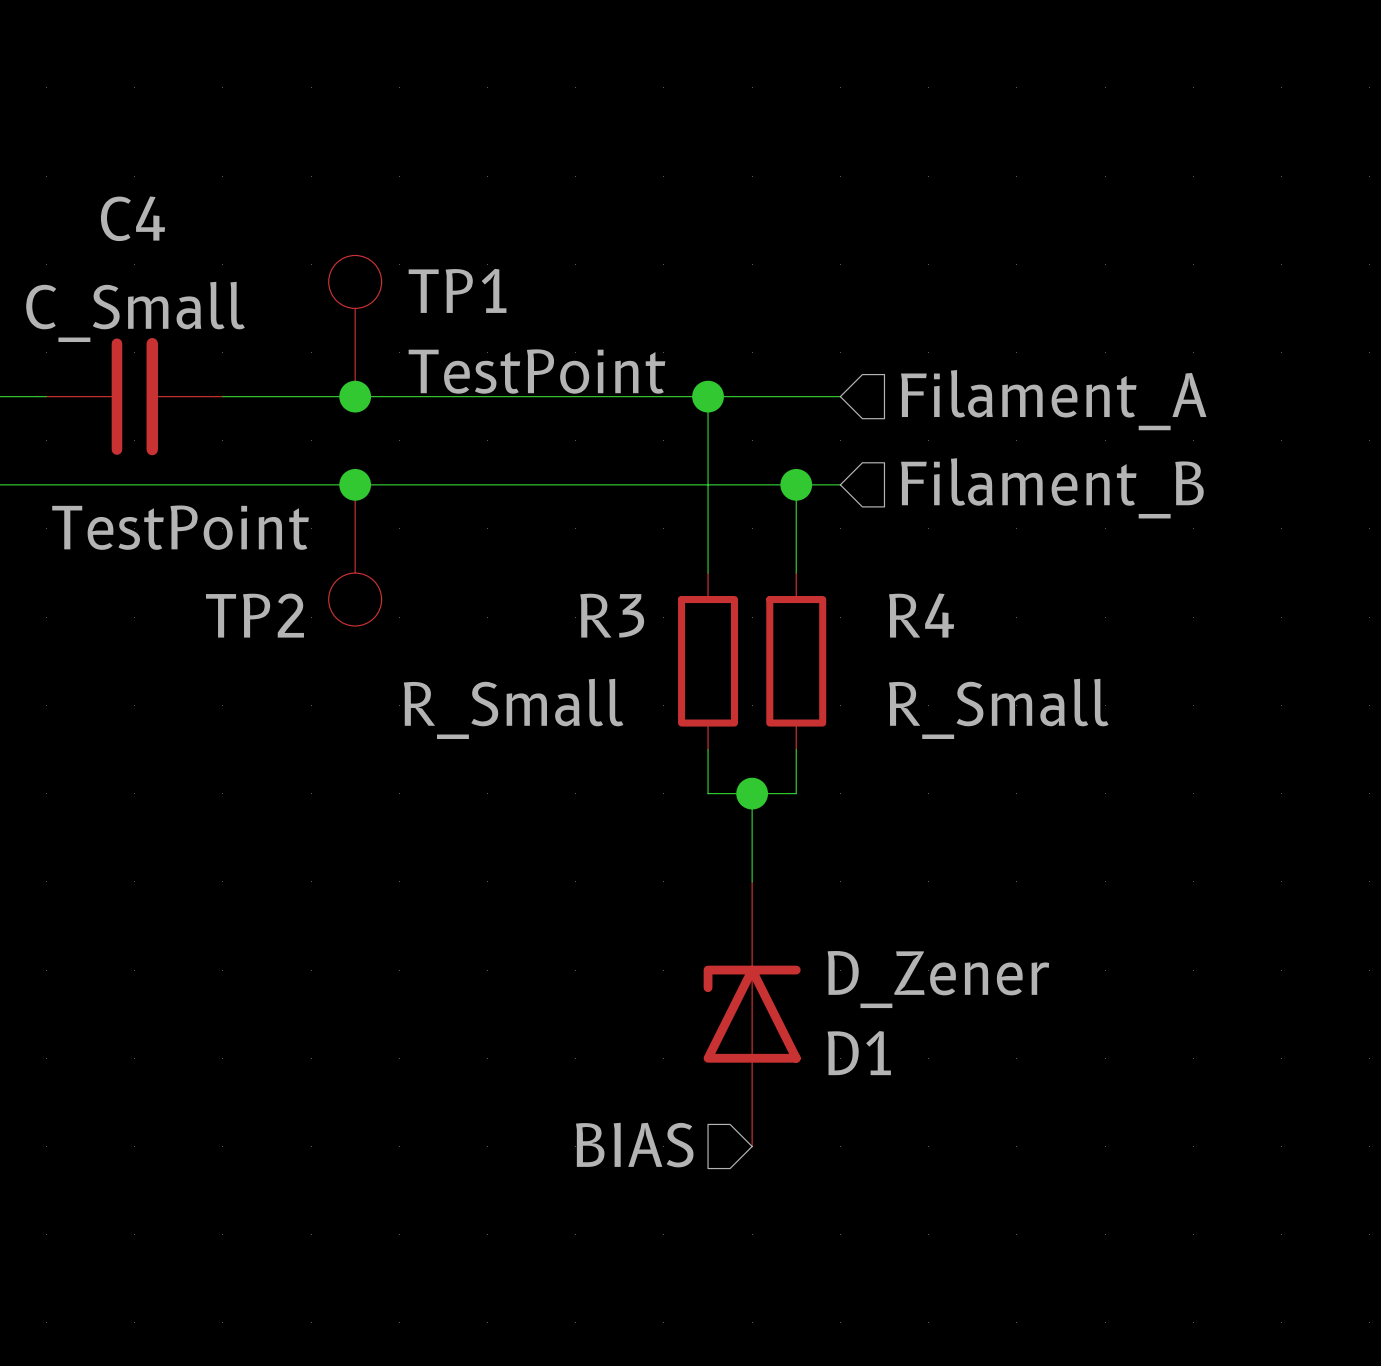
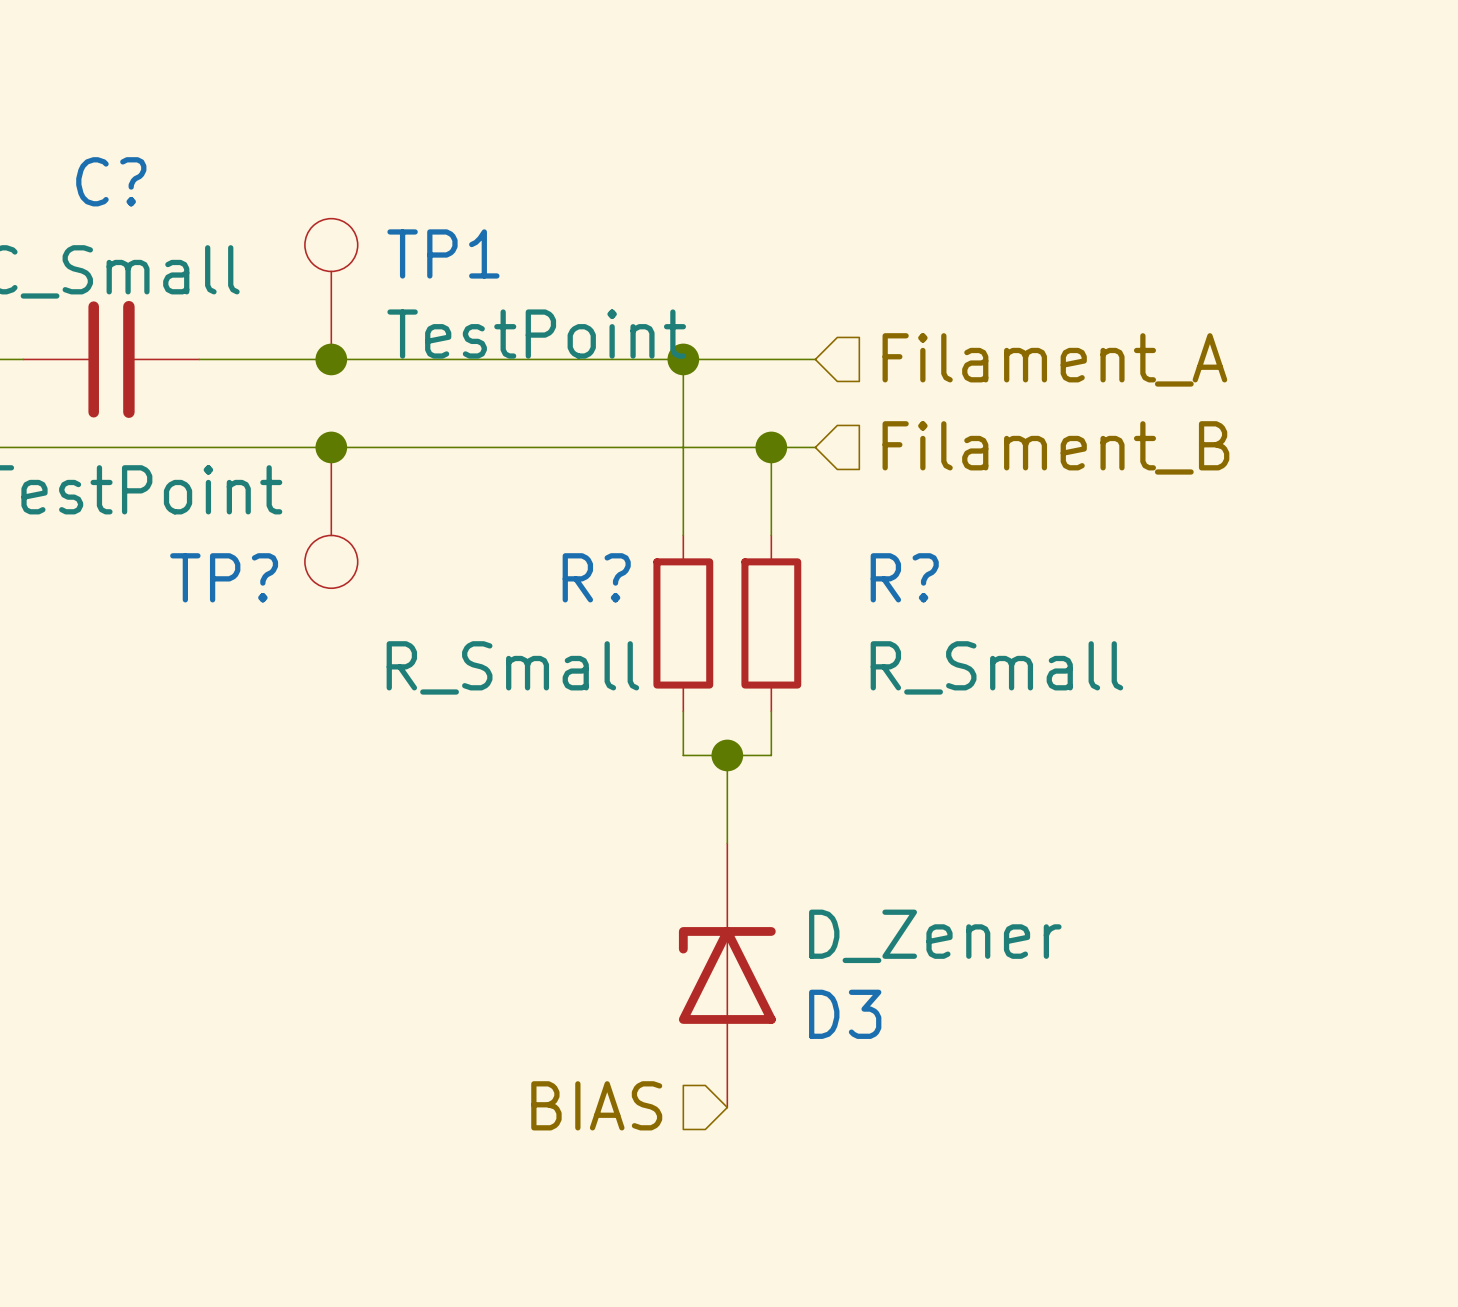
C4 name: C4 (133, 218) -> C? (111, 181)
TP2 name: TP2 (254, 615) -> TP? (224, 577)
R3 name: R3 (612, 615) -> R? (596, 577)
R4 name: R4 (921, 615) -> R? (904, 577)
D1 name: D1 (859, 1053) -> D3 (845, 1014)

